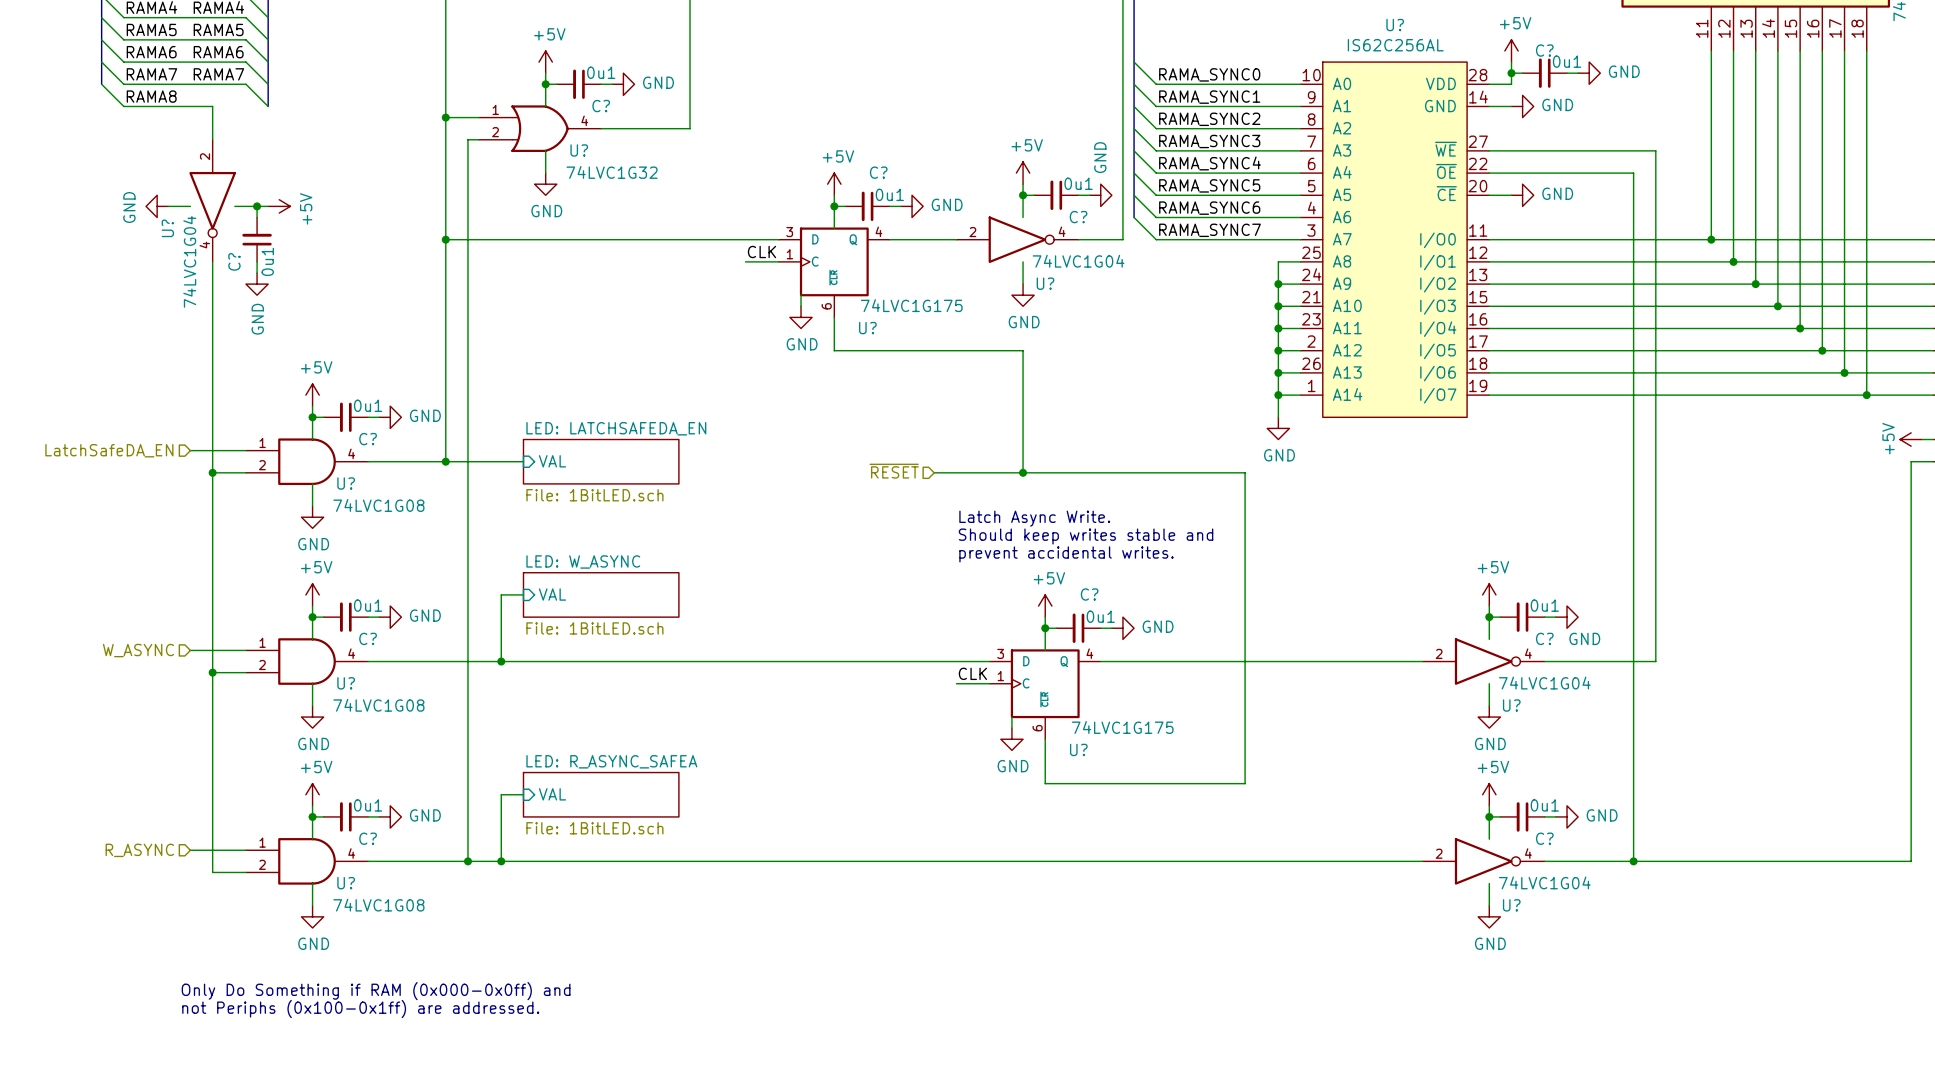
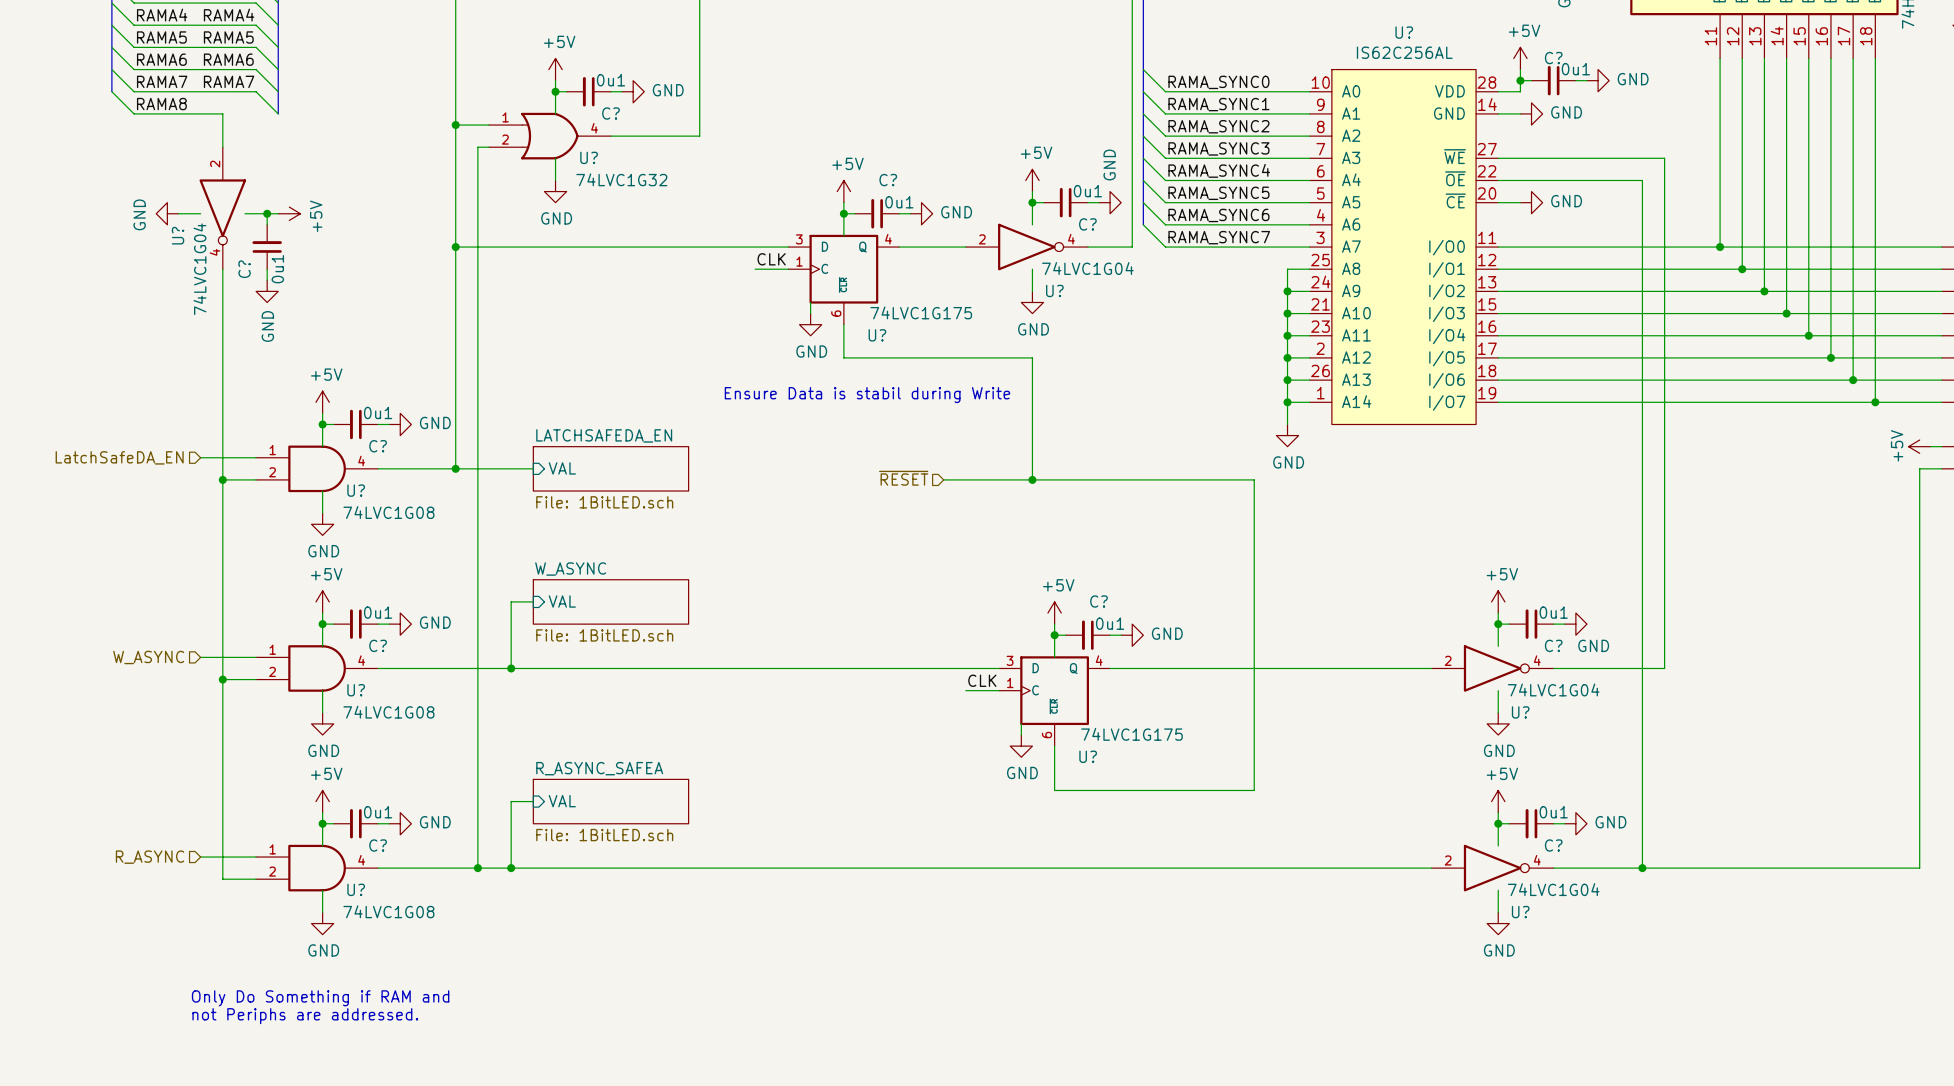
text: none -> Ensure Data is stabil during Write (867, 395)
sheet LATCHSAFEDA_EN name: LED: LATCHSAFEDA_EN (616, 428) -> LATCHSAFEDA_EN (604, 435)
text: Latch Async Write. (1034, 518) -> none
text: Should keep writes stable and (1086, 536) -> none
text: prevent accidental writes. (1066, 554) -> none
sheet W_ASYNC name: LED: W_ASYNC (583, 561) -> W_ASYNC (570, 569)
sheet R_ASYNC_SAFEA name: LED: R_ASYNC_SAFEA (611, 761) -> R_ASYNC_SAFEA (599, 768)
text: Only Do Something if RAM (0x000-0x0ff) and (376, 991) -> Only Do Something if RAM and (320, 998)
text: not Periphs (0x100-0x1ff) are addressed. (360, 1009) -> not Periphs are addressed. (305, 1016)

